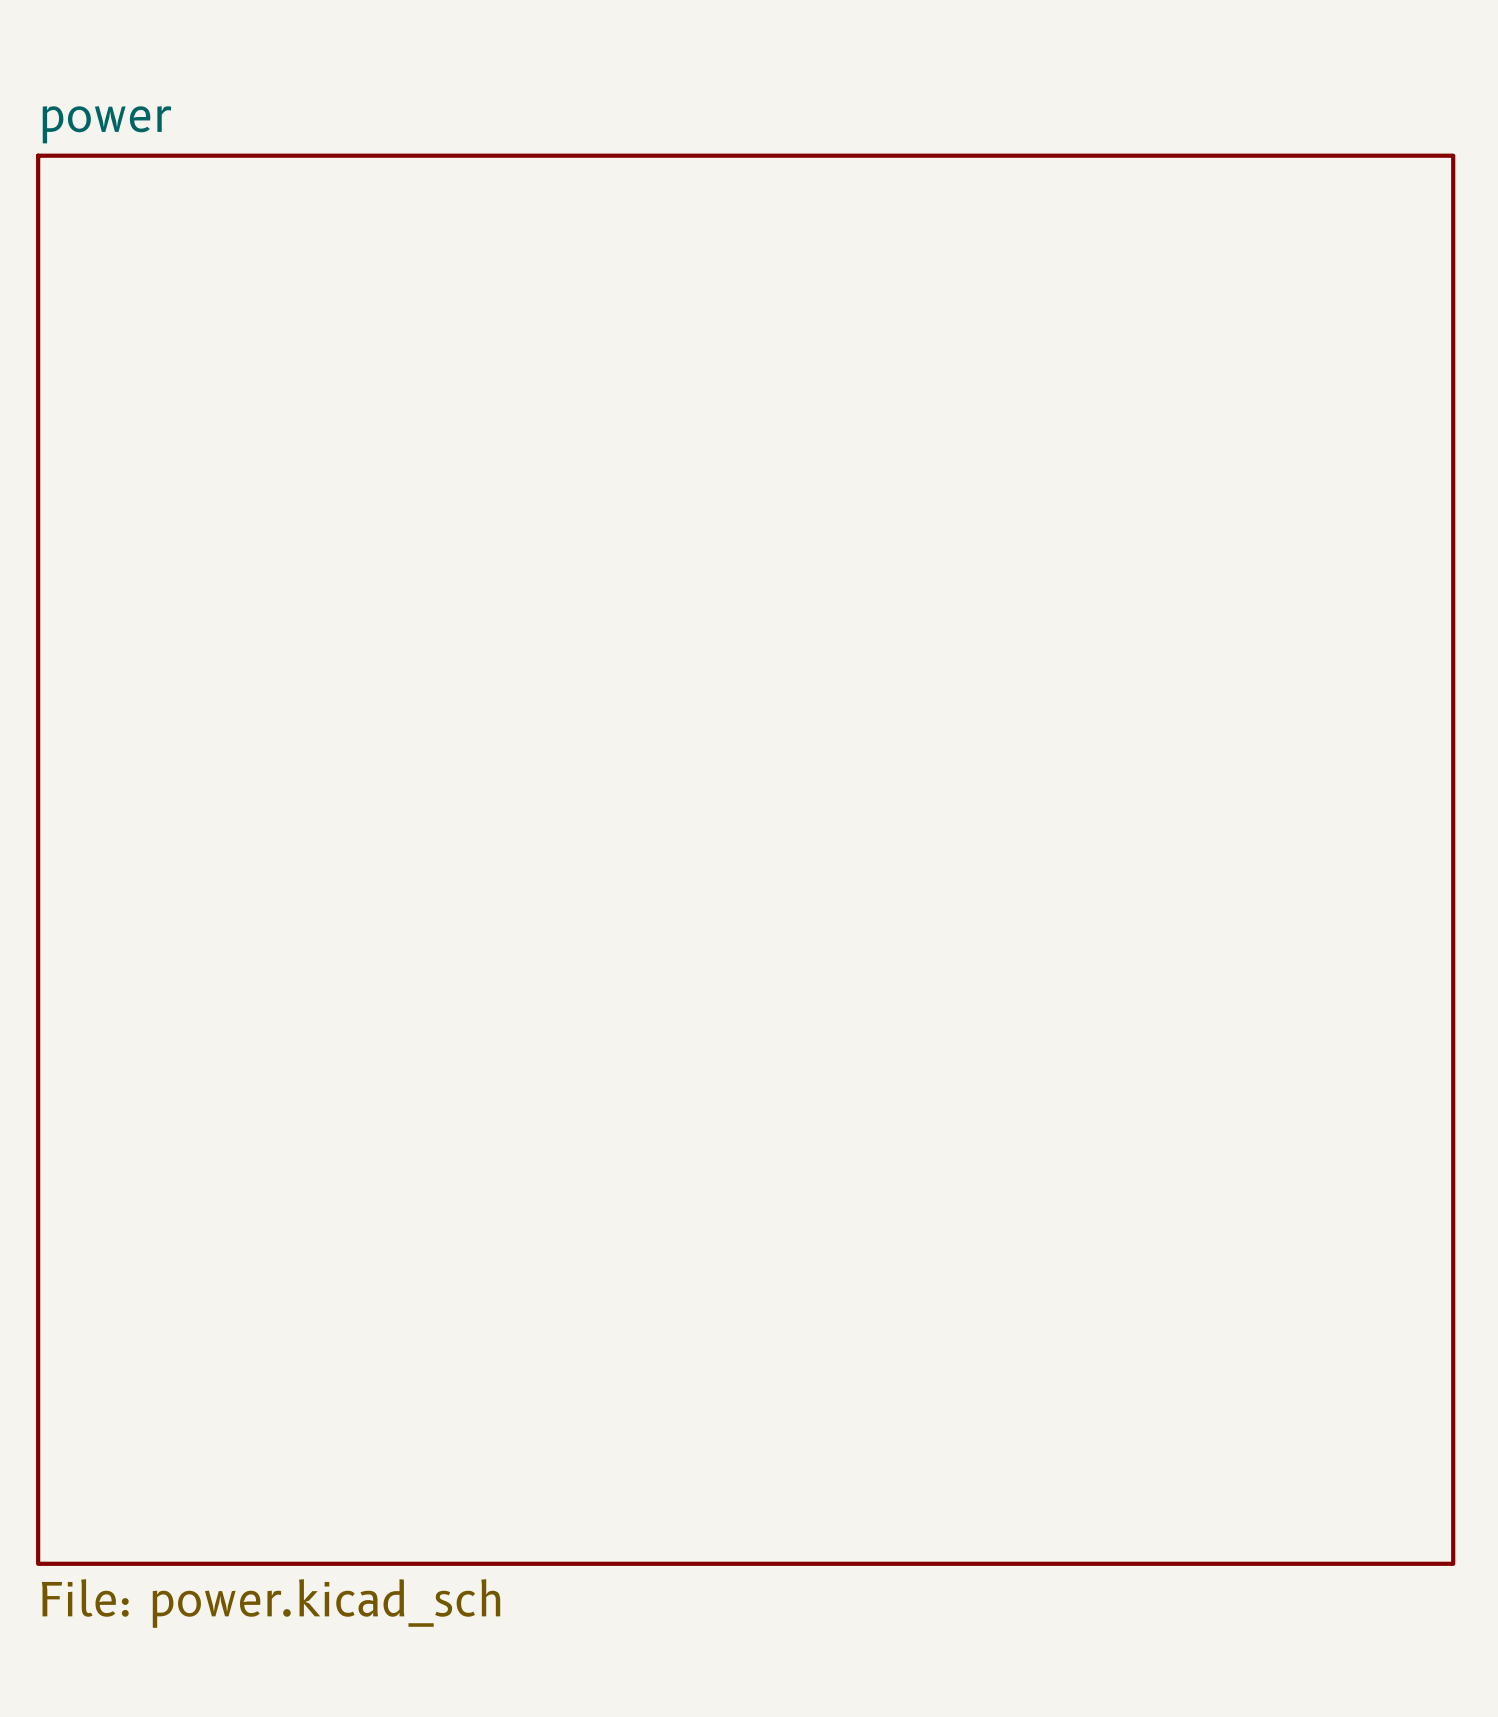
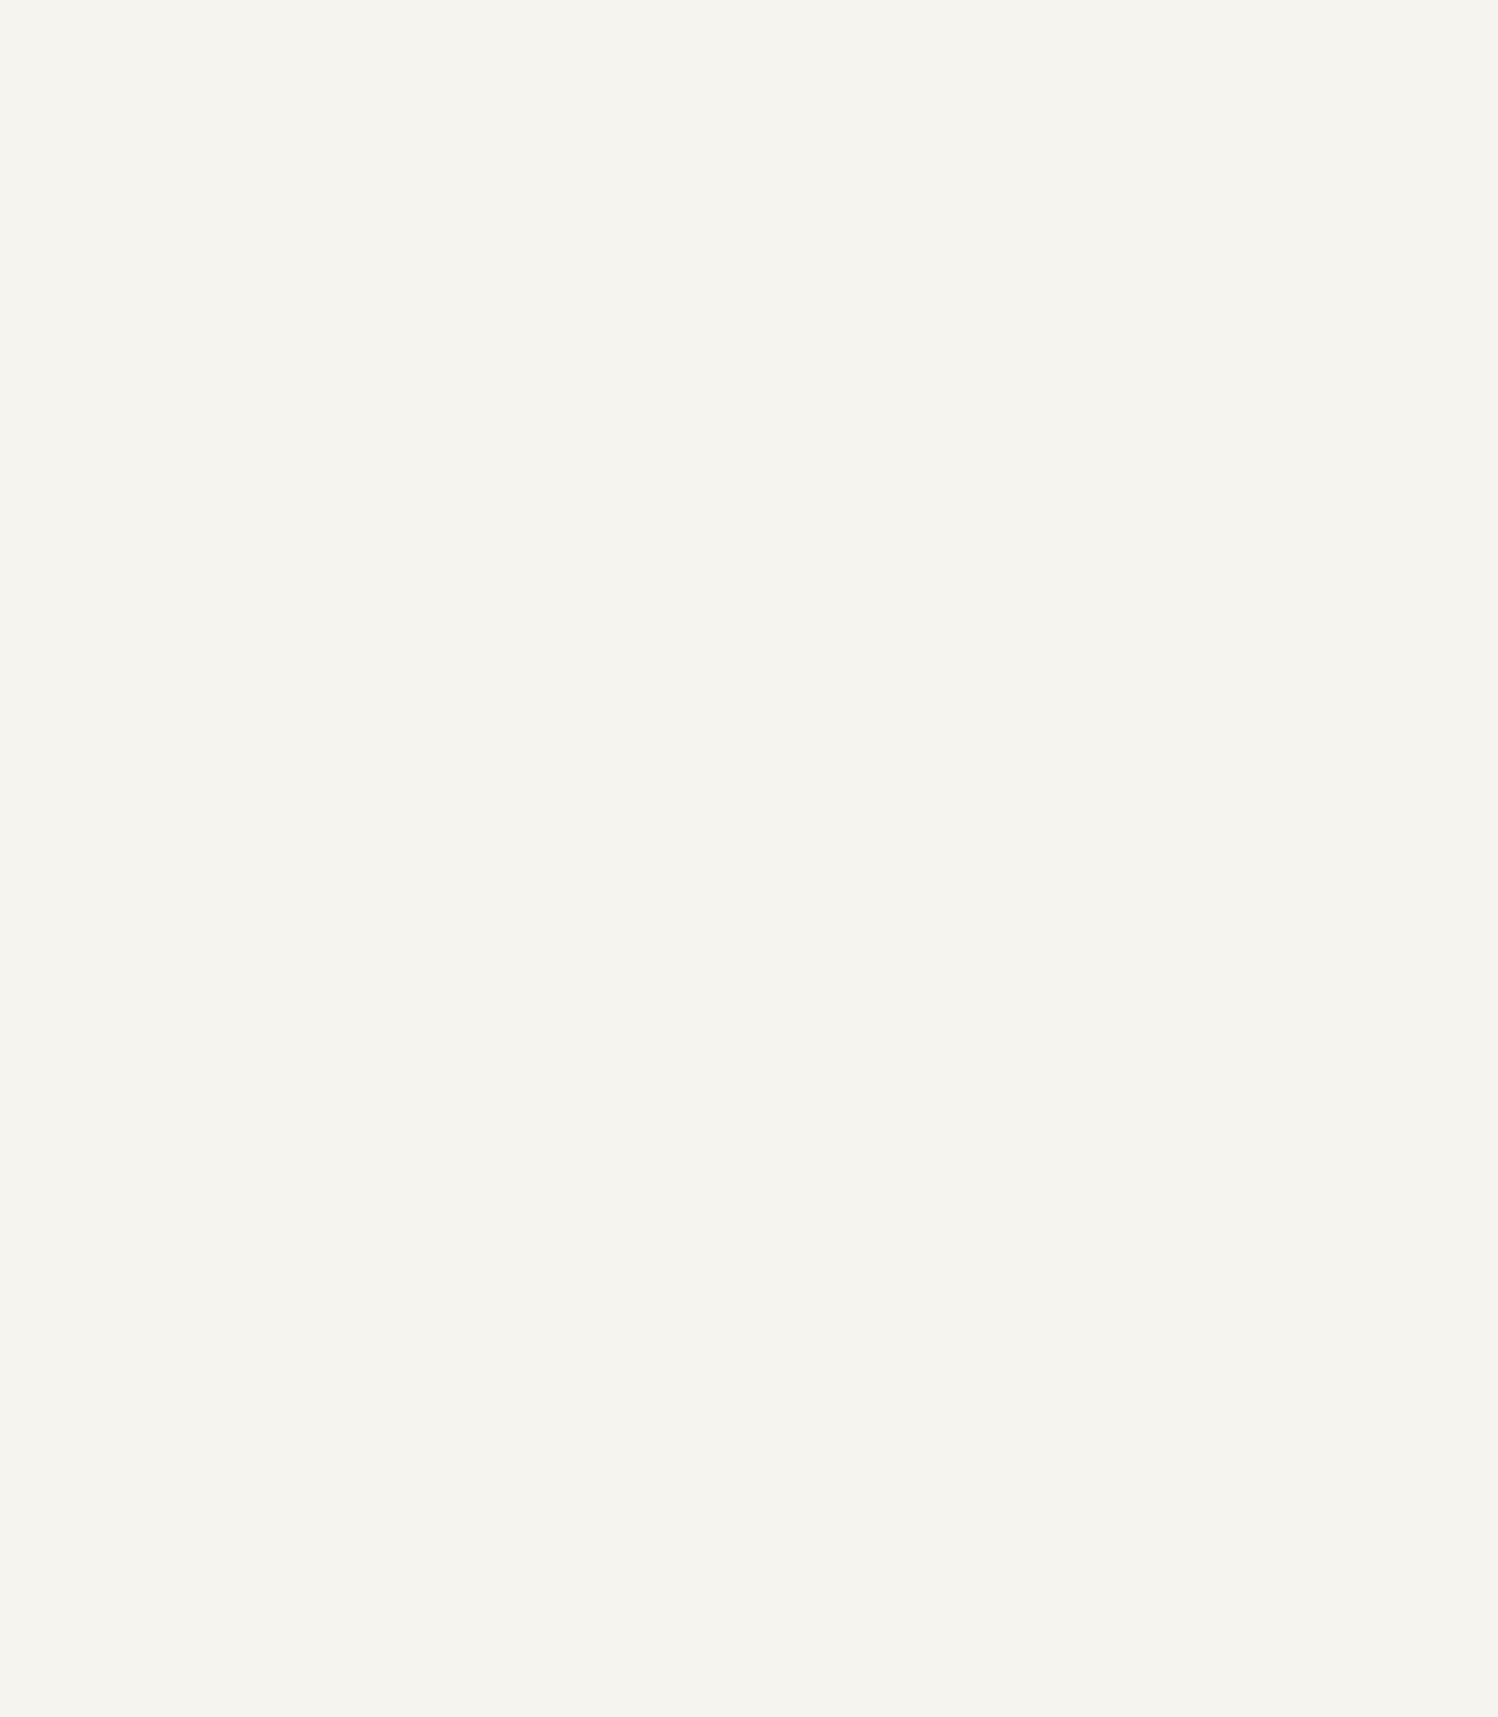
sheet power: File: power.kicad_sch (745, 859) -> none

